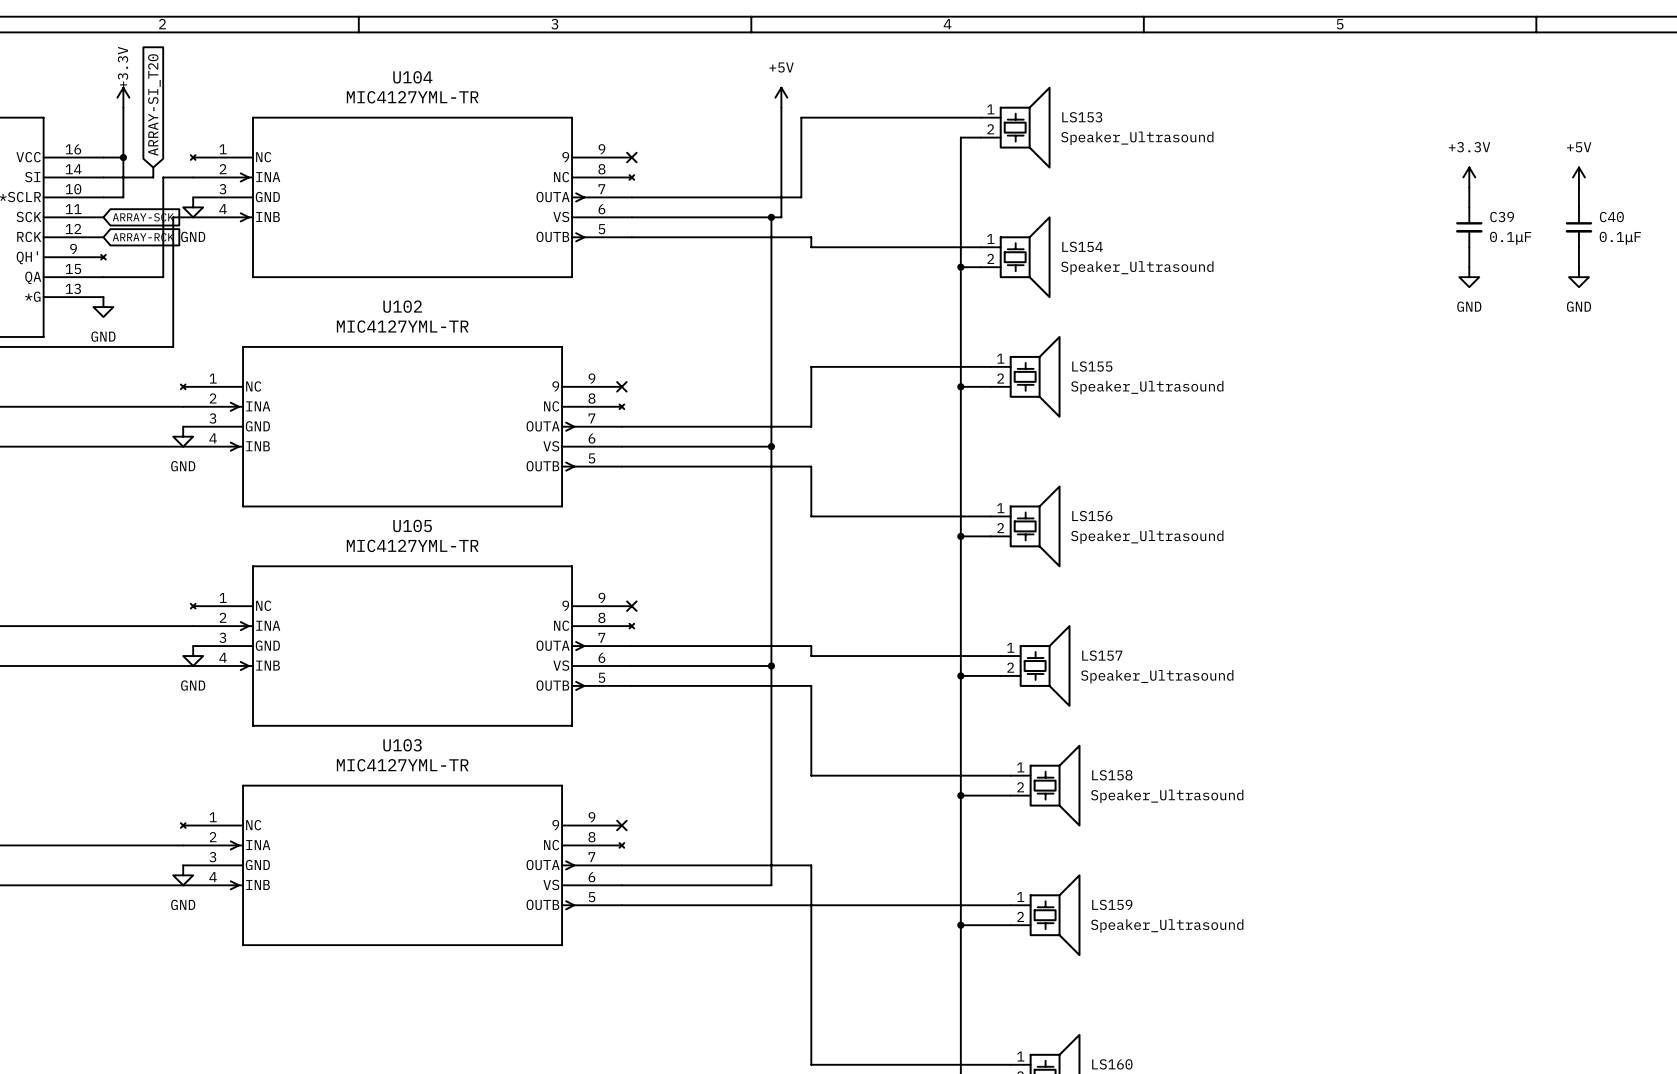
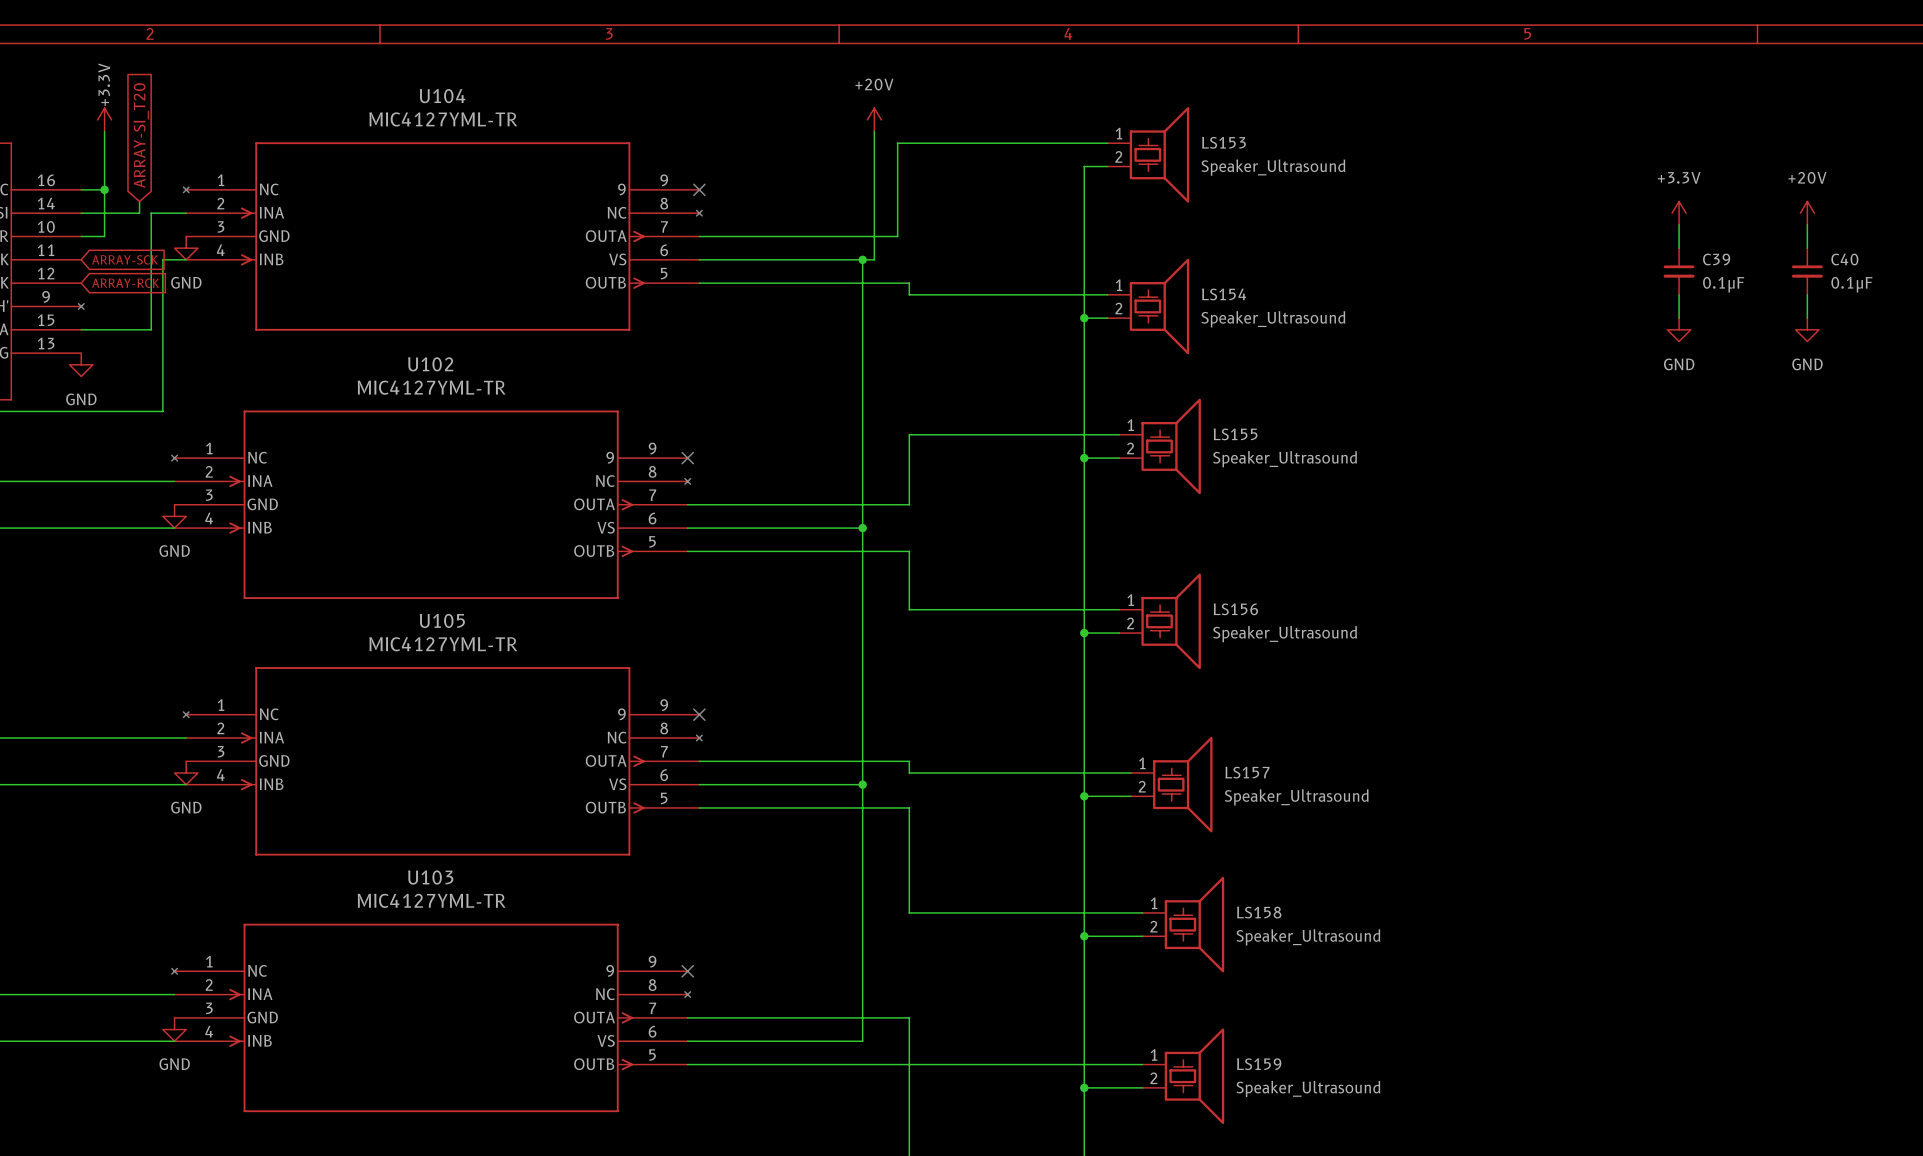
power symbol: +5V (781, 97) -> +20V (874, 119)
power symbol: +5V (1578, 177) -> +20V (1807, 213)

